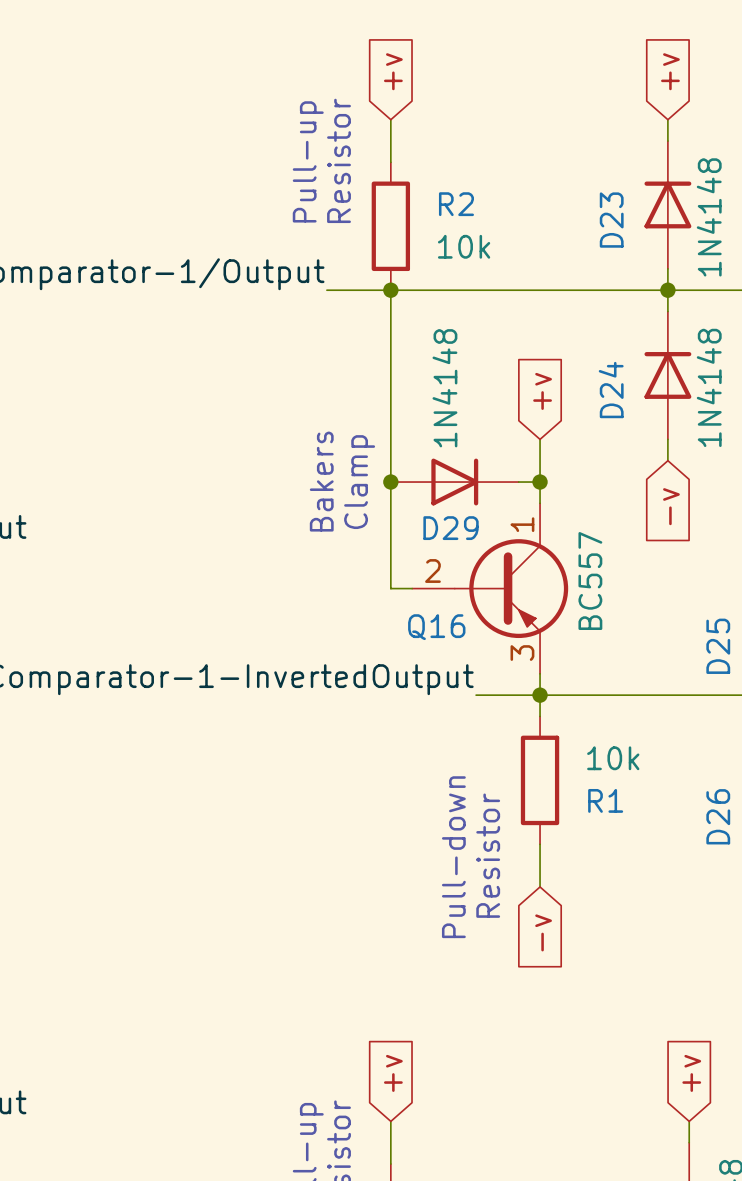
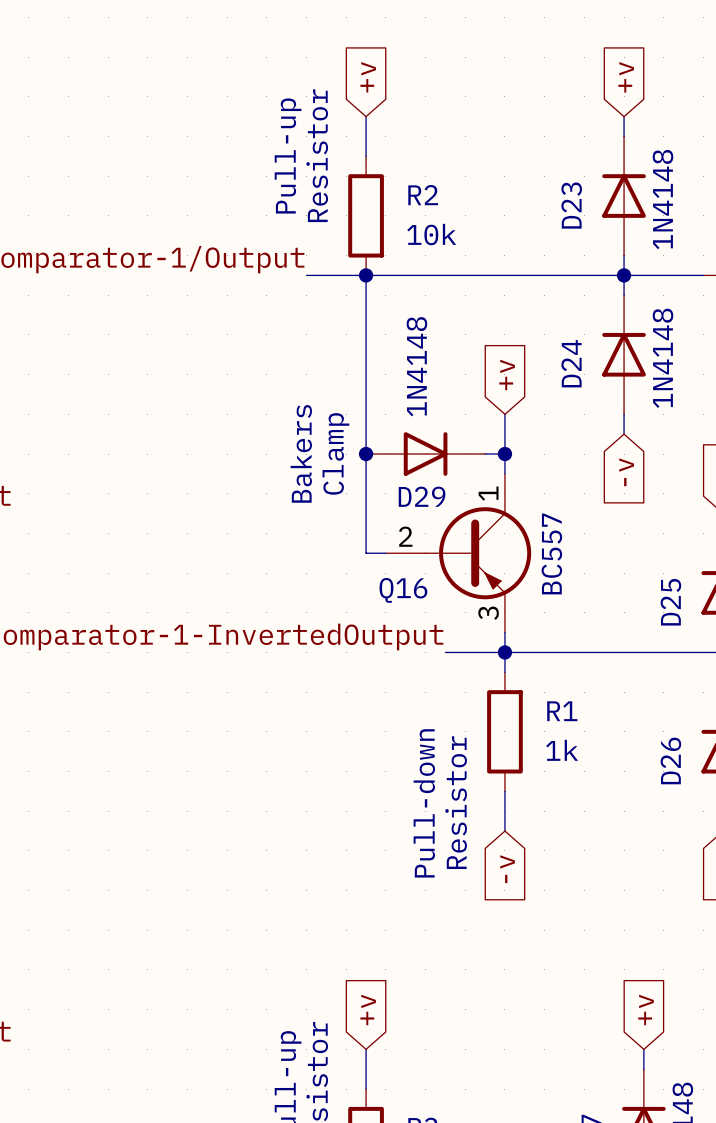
R1 value: 10k (613, 758) -> 1k (562, 750)
R1 name position: R1 (605, 800) -> R1 (562, 711)

